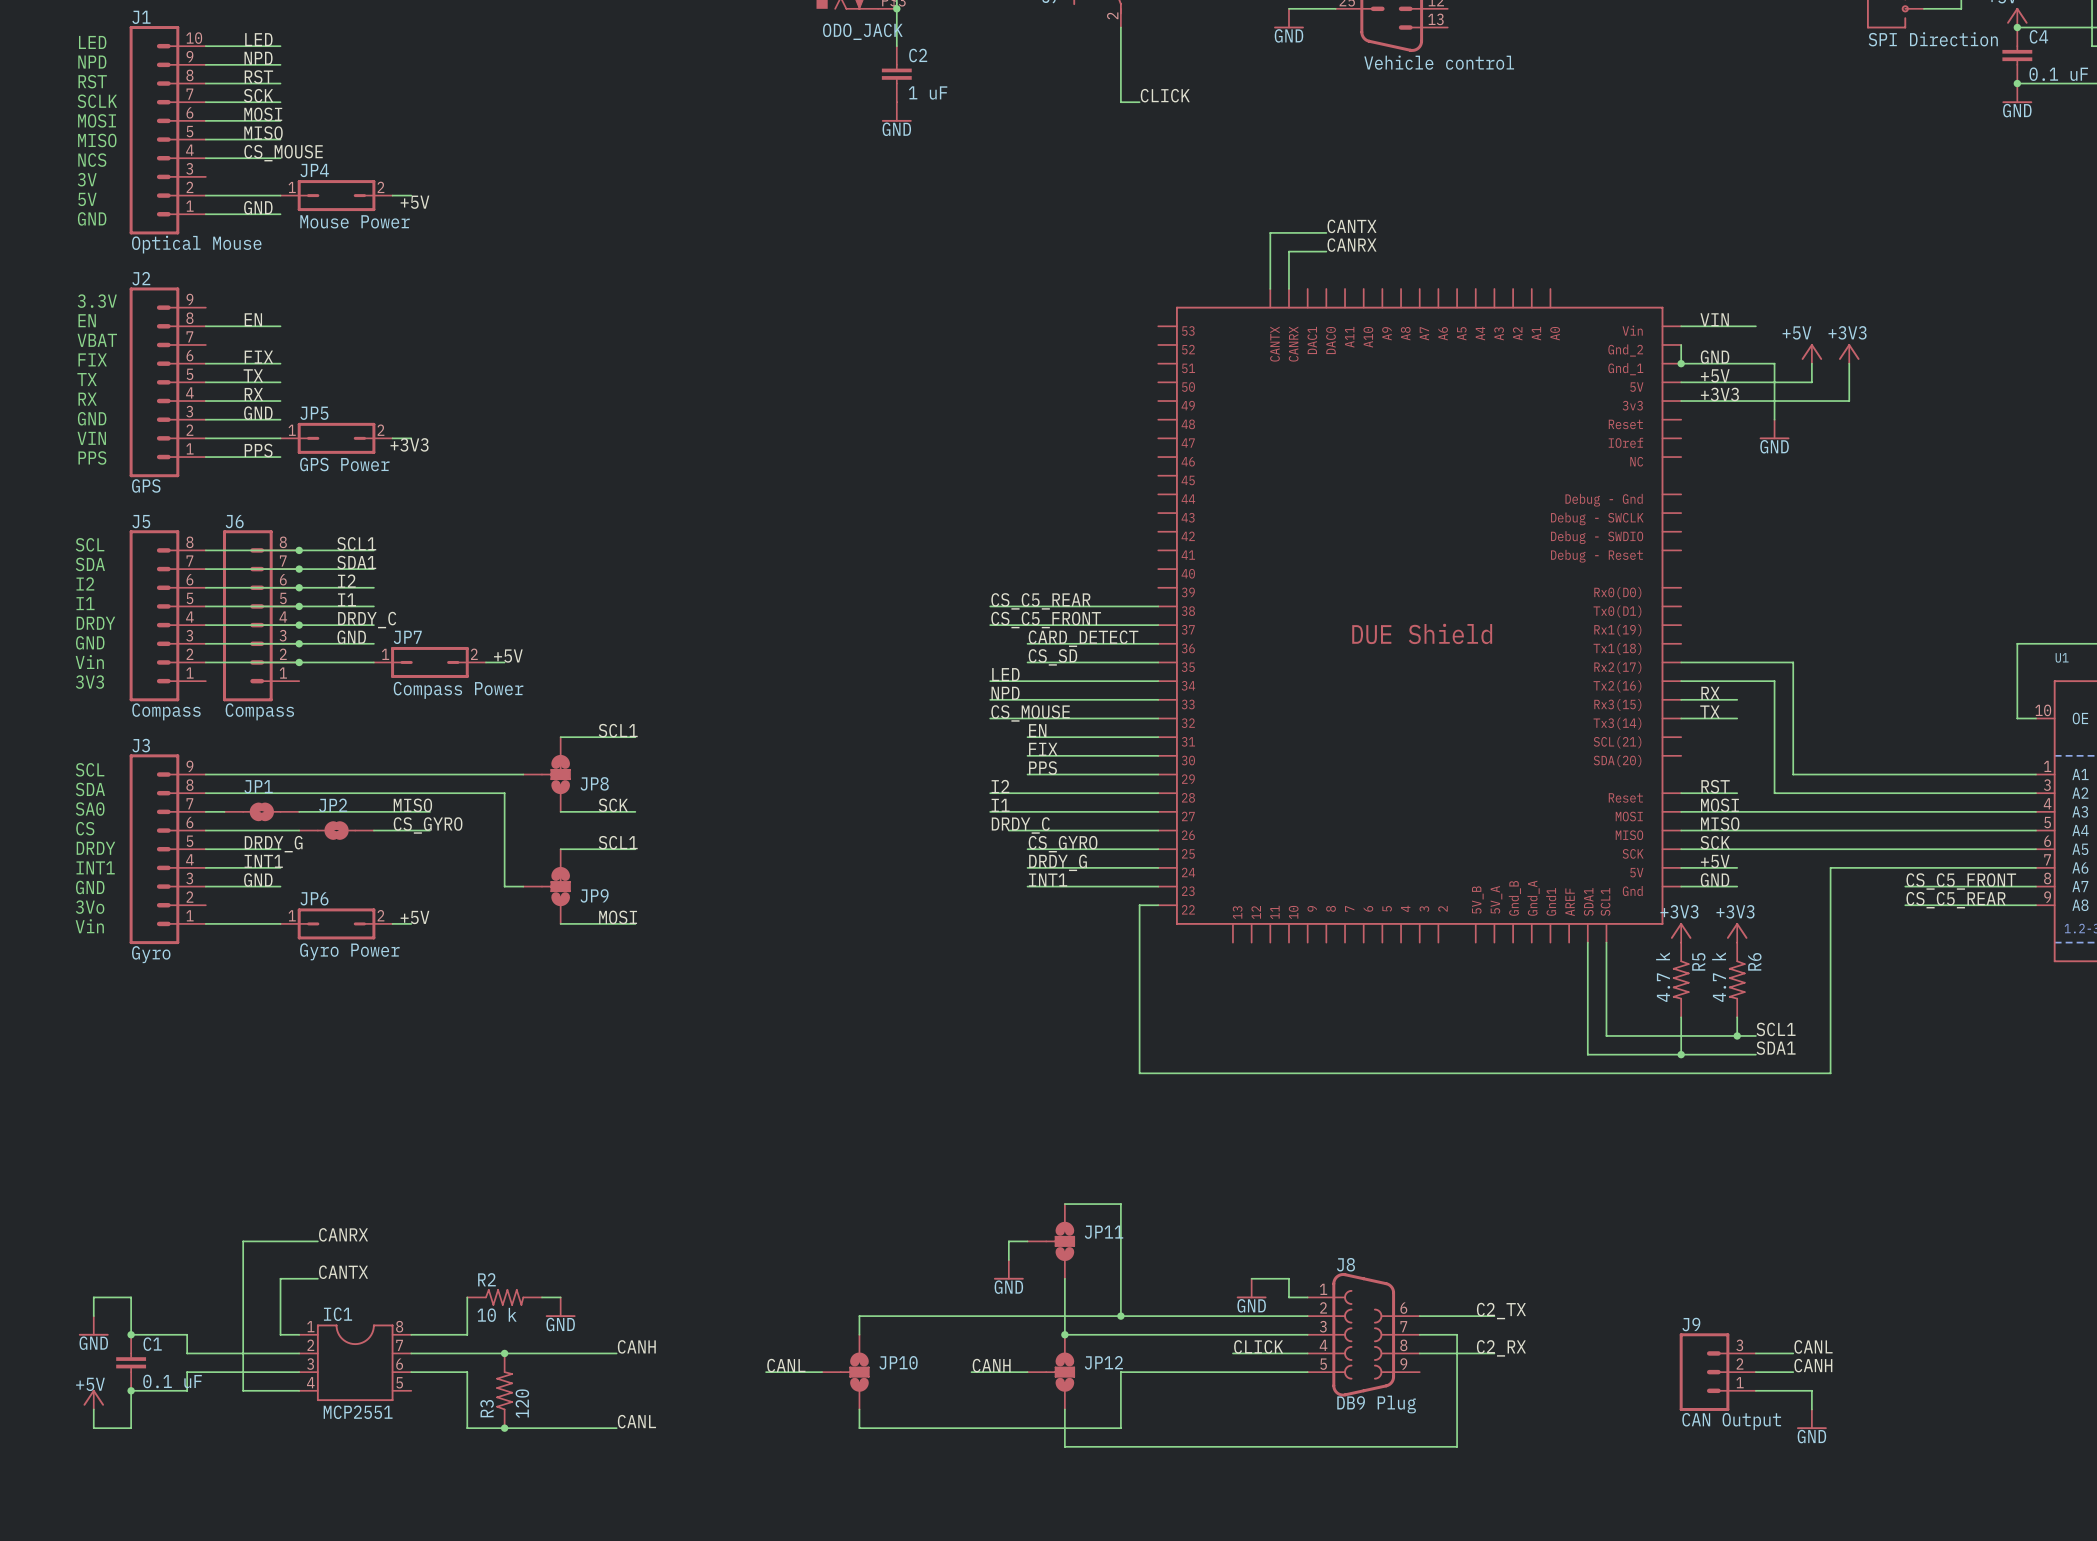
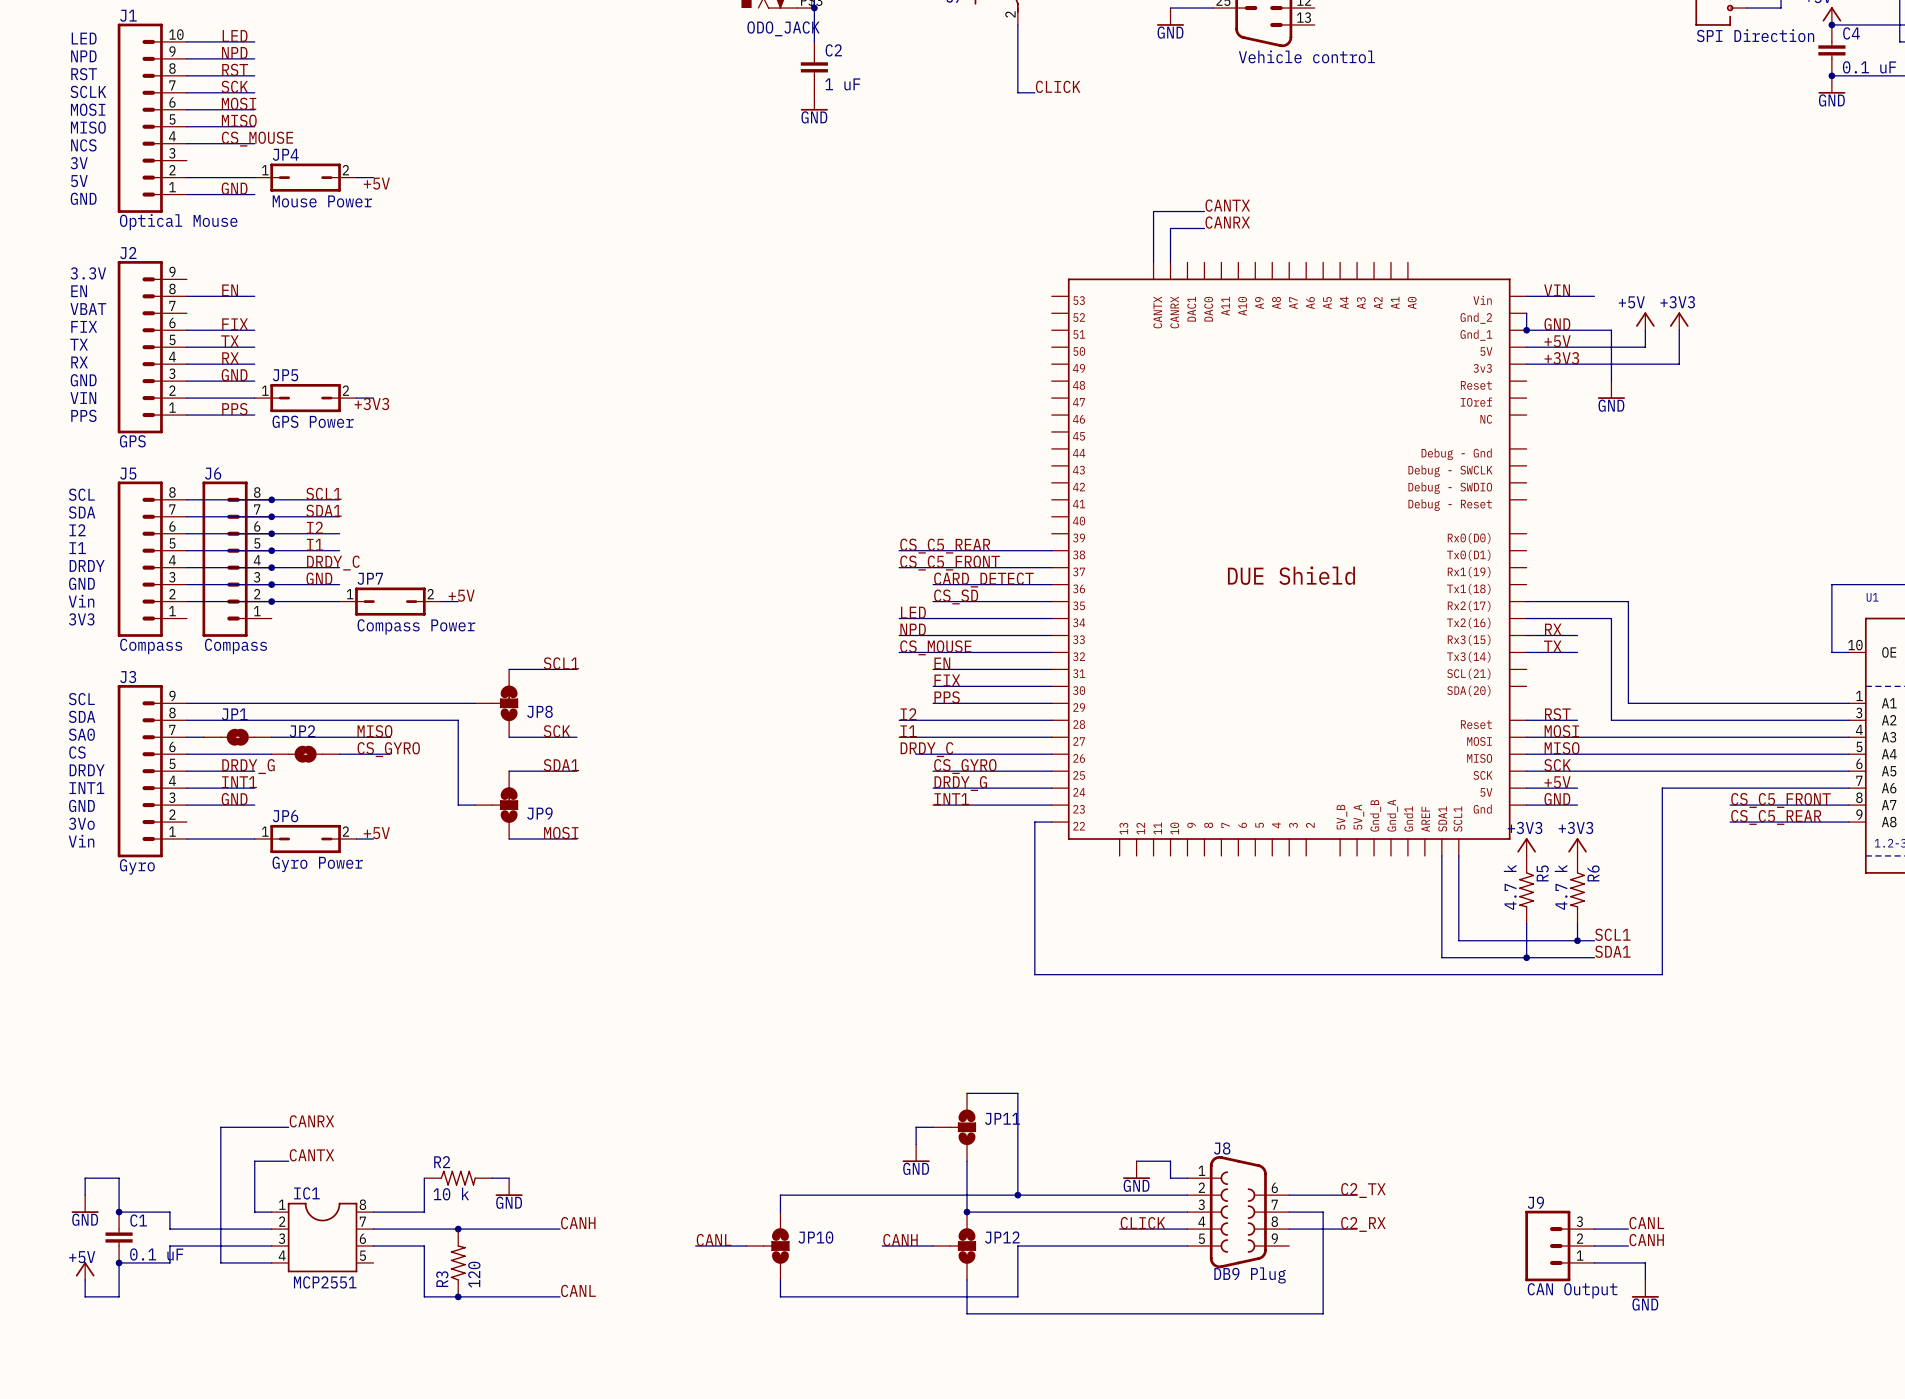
label: SCL1 (618, 842) -> SDA1 (561, 765)

